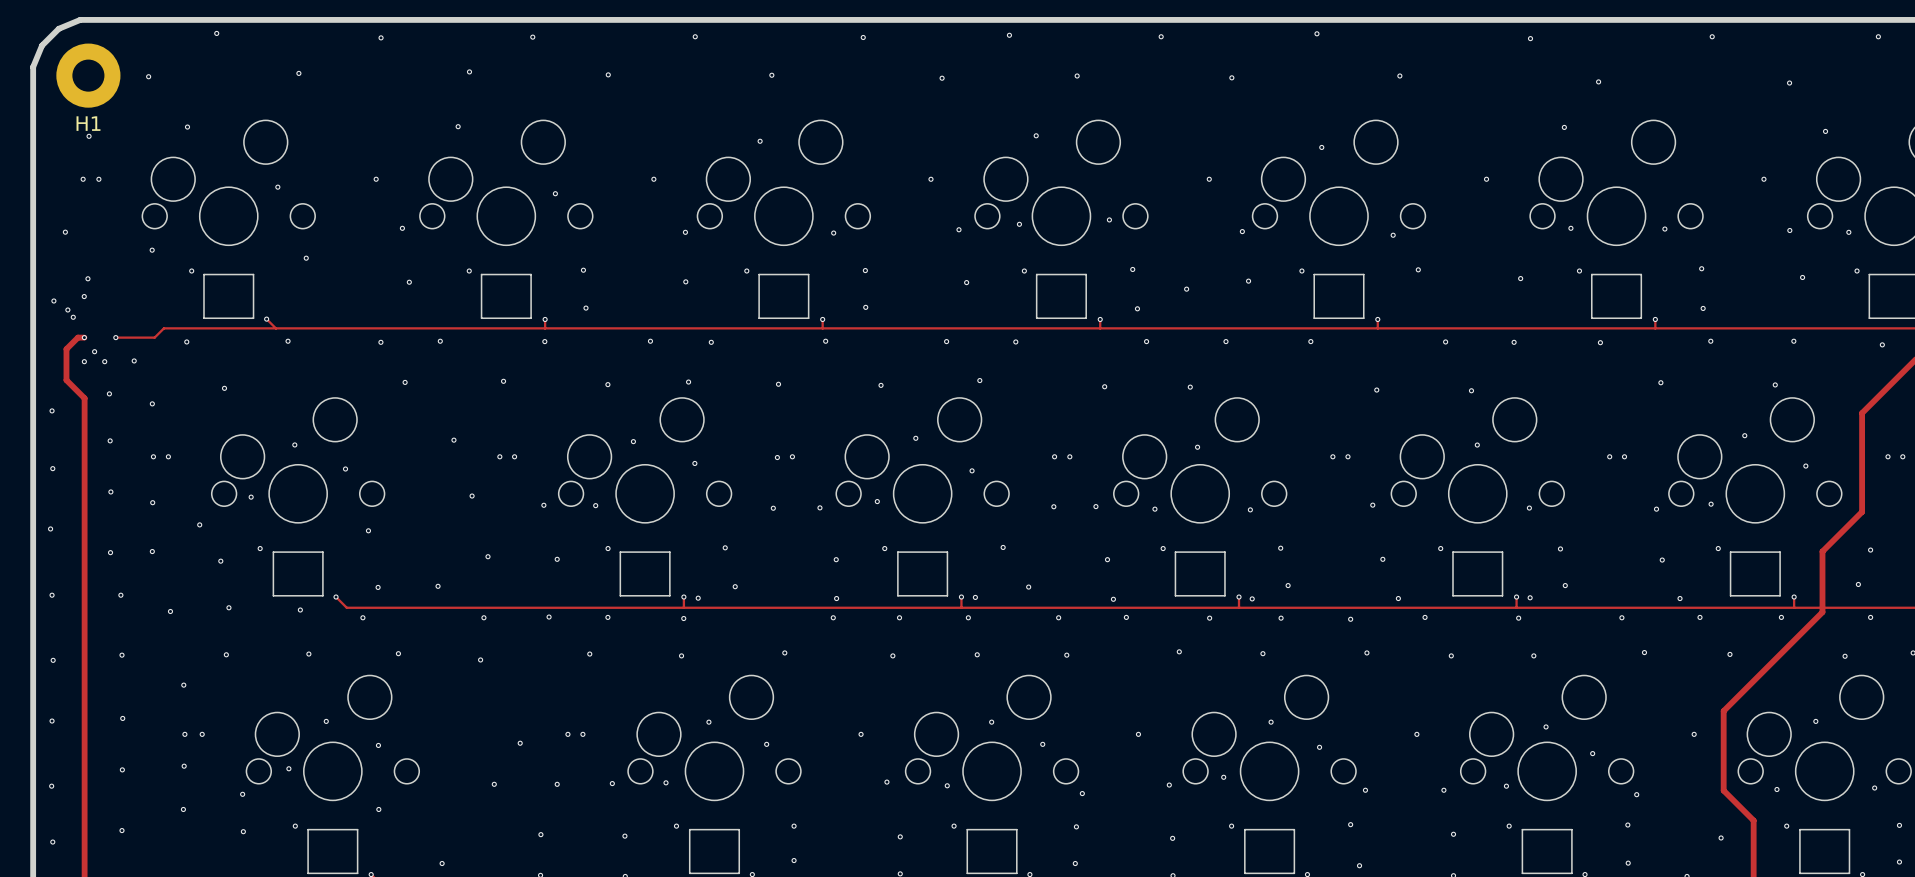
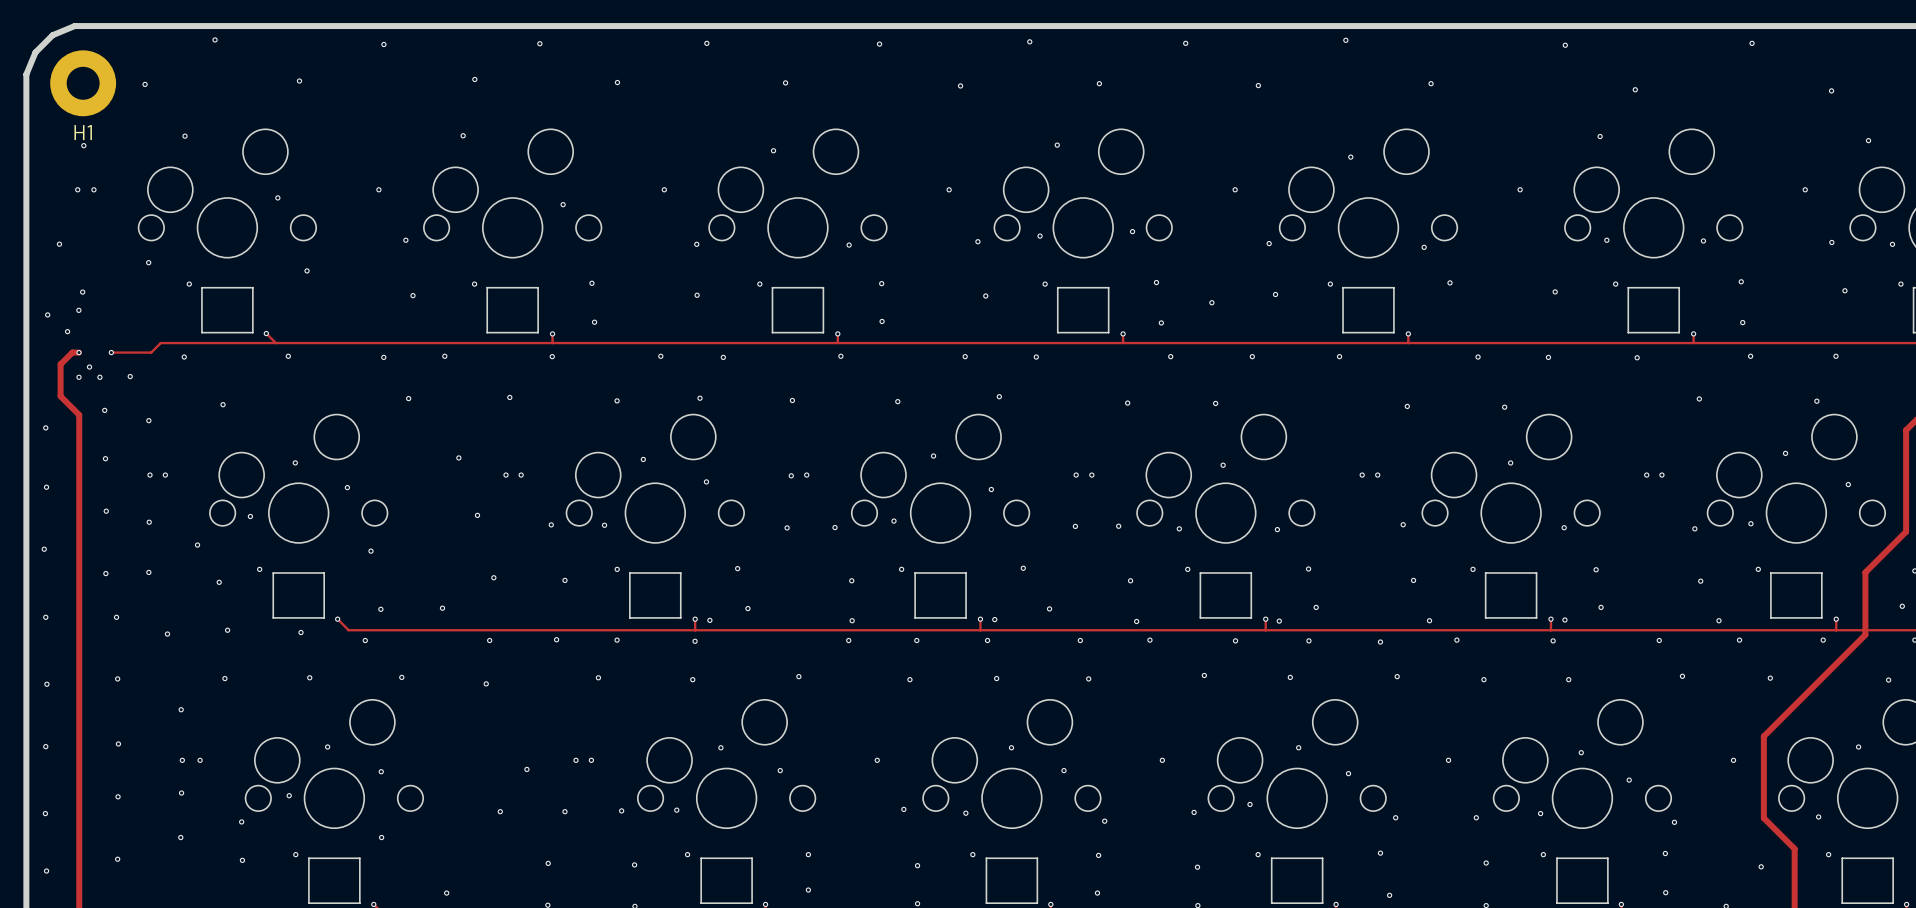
via: (67, 309) -> none

